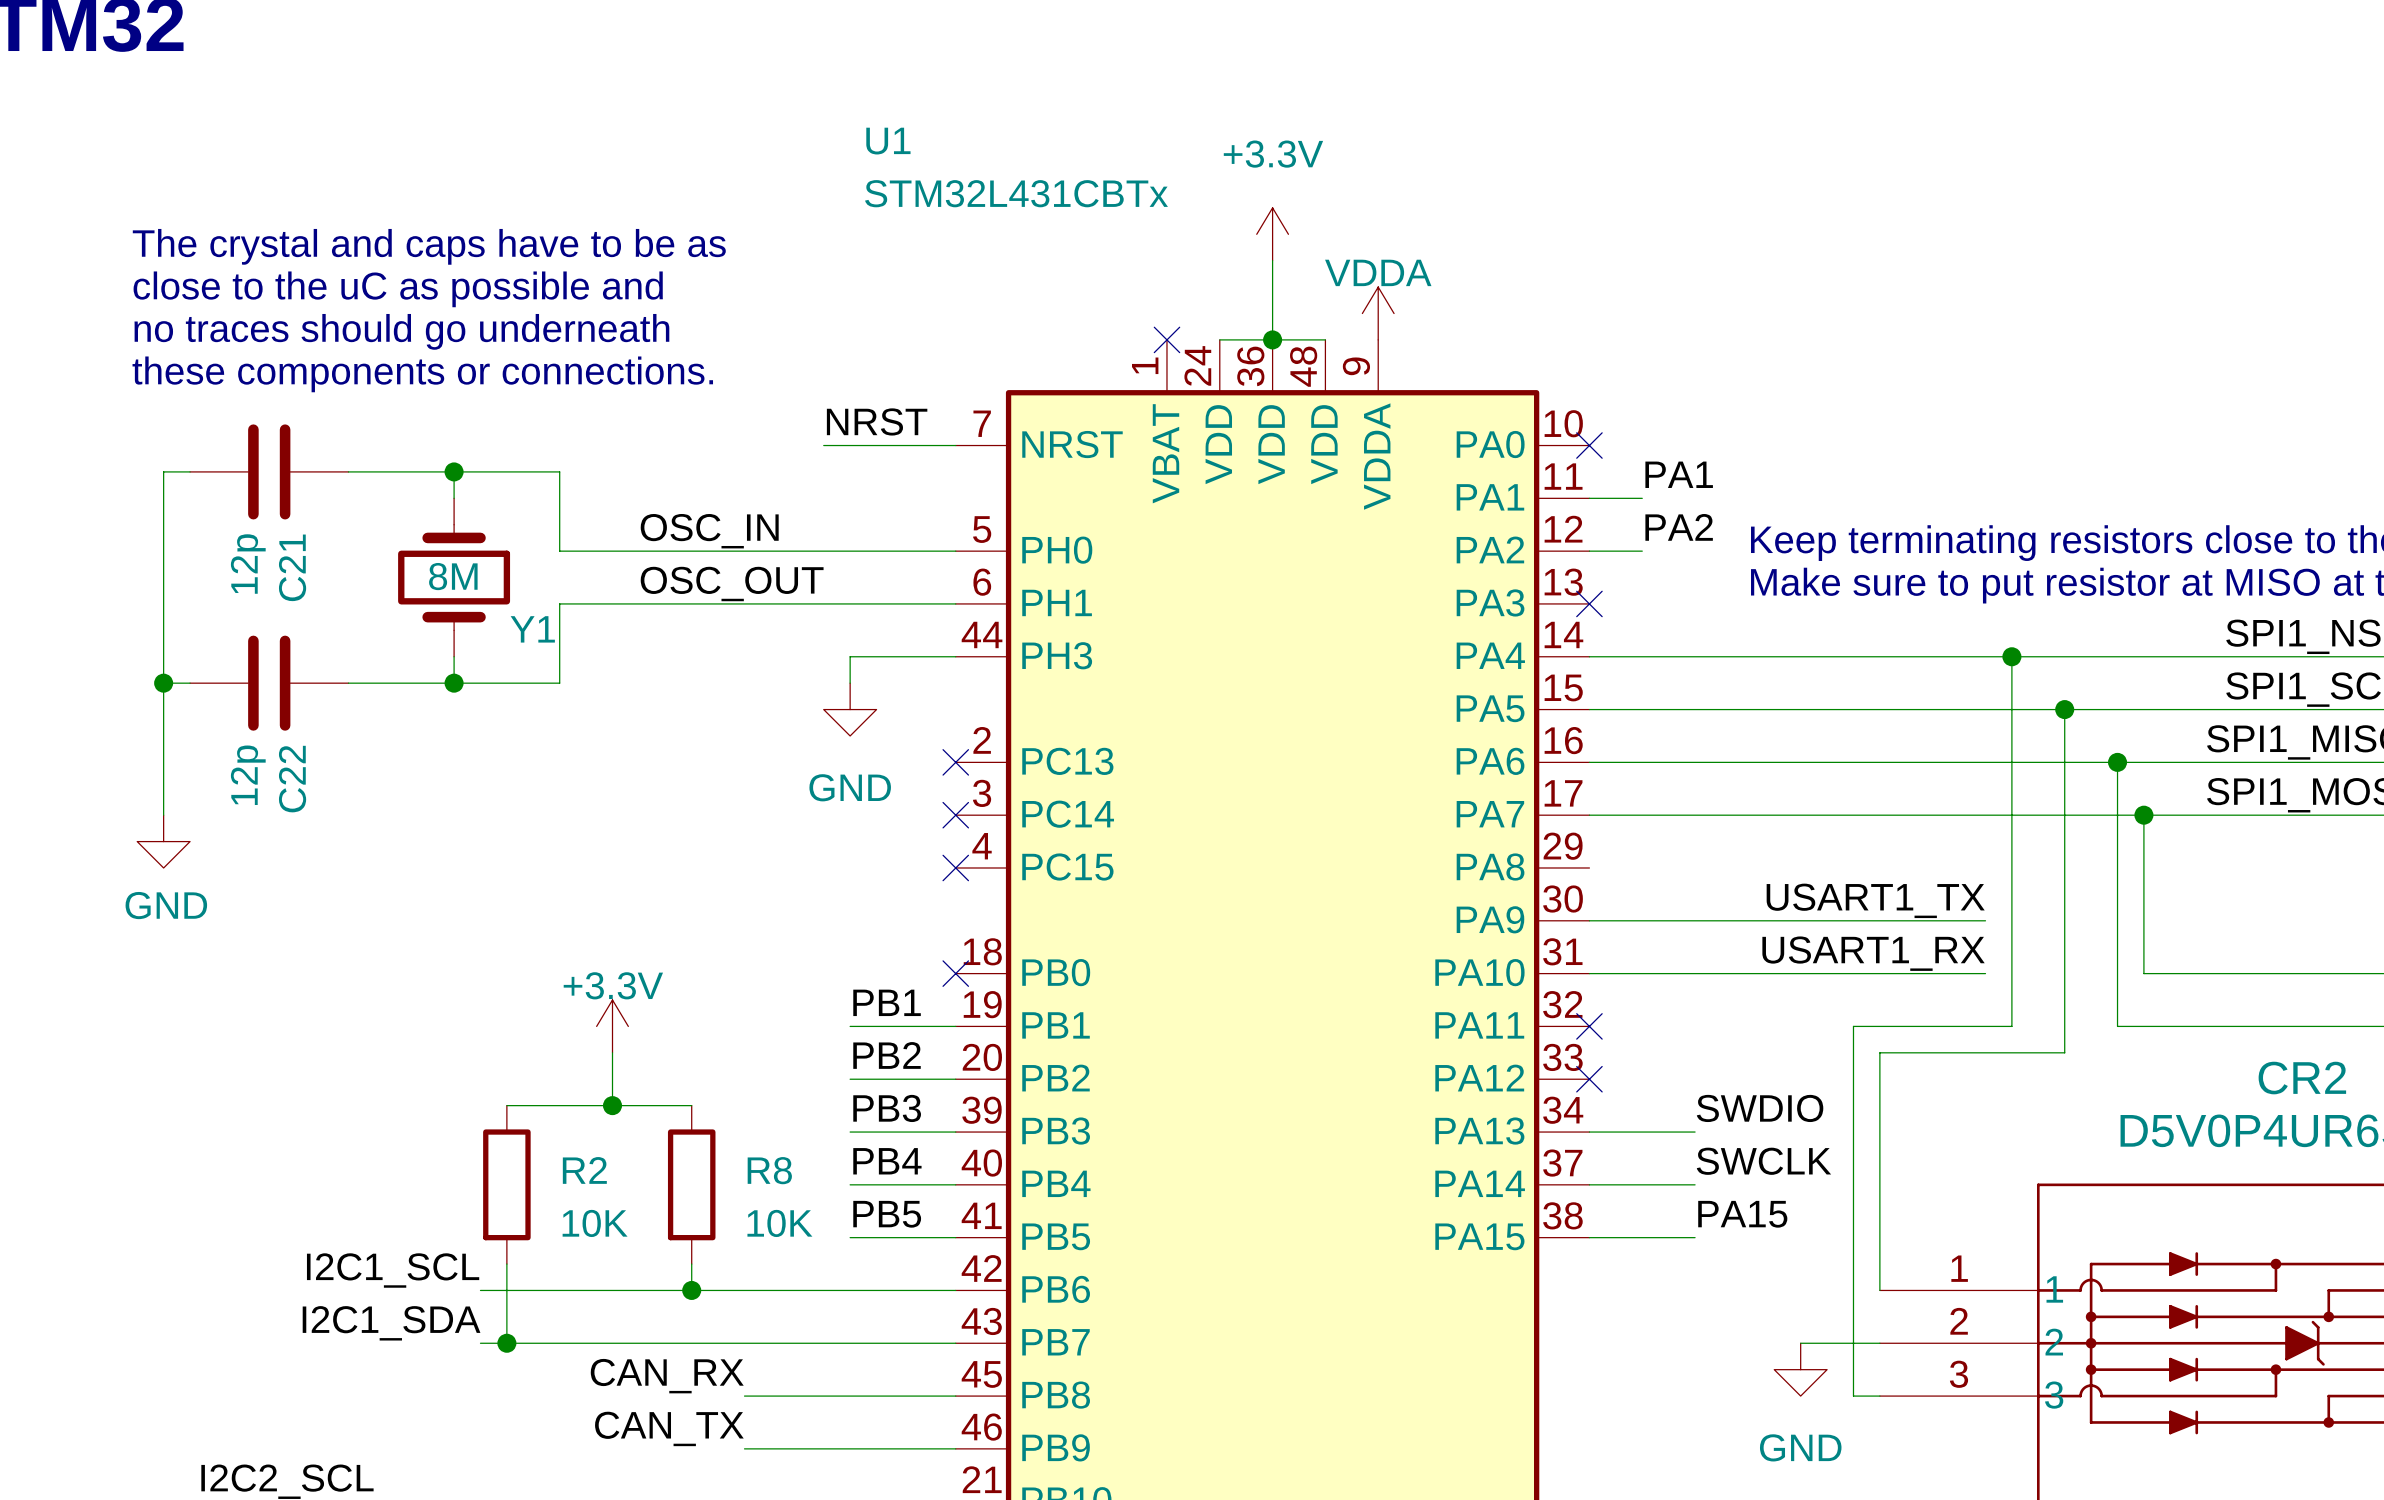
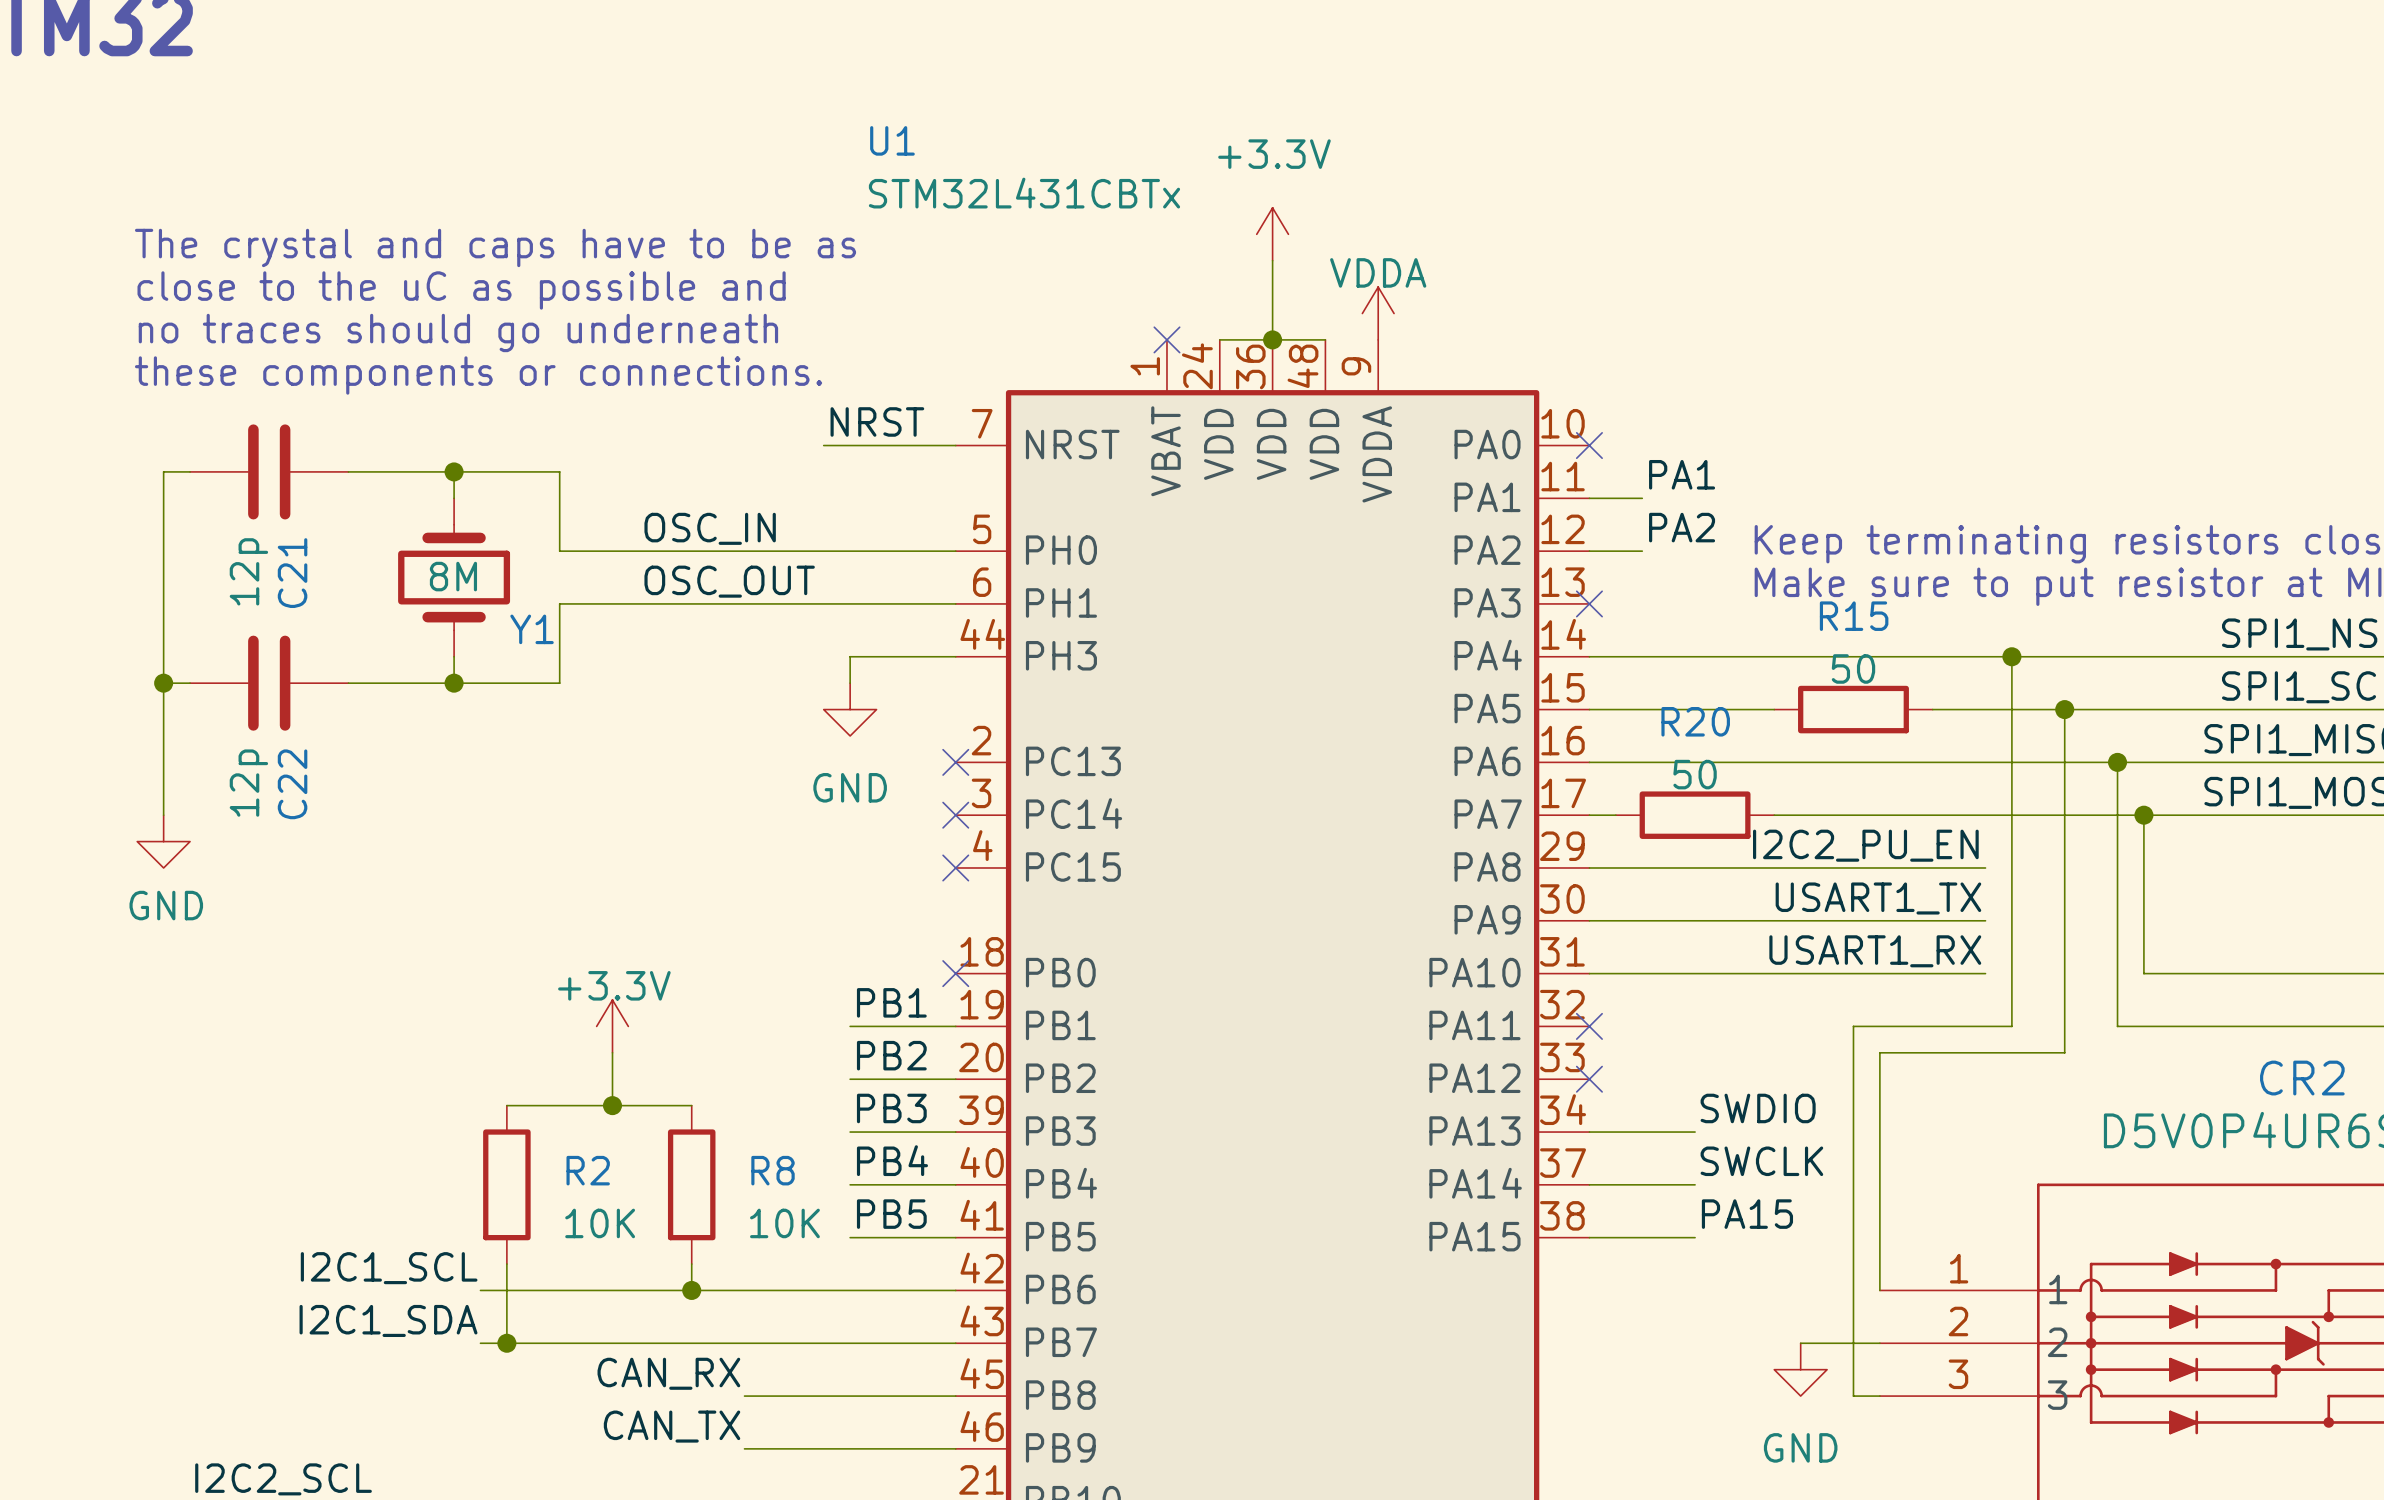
wire: (1774, 709) (1932, 709) -> none
R15: none -> 50 (1853, 709)
wire: (1615, 815) (1774, 815) -> none
R20: none -> 50 (1695, 815)
label: none -> I2C2_PU_EN (1865, 845)
wire: none -> (1589, 867) (1985, 867)

